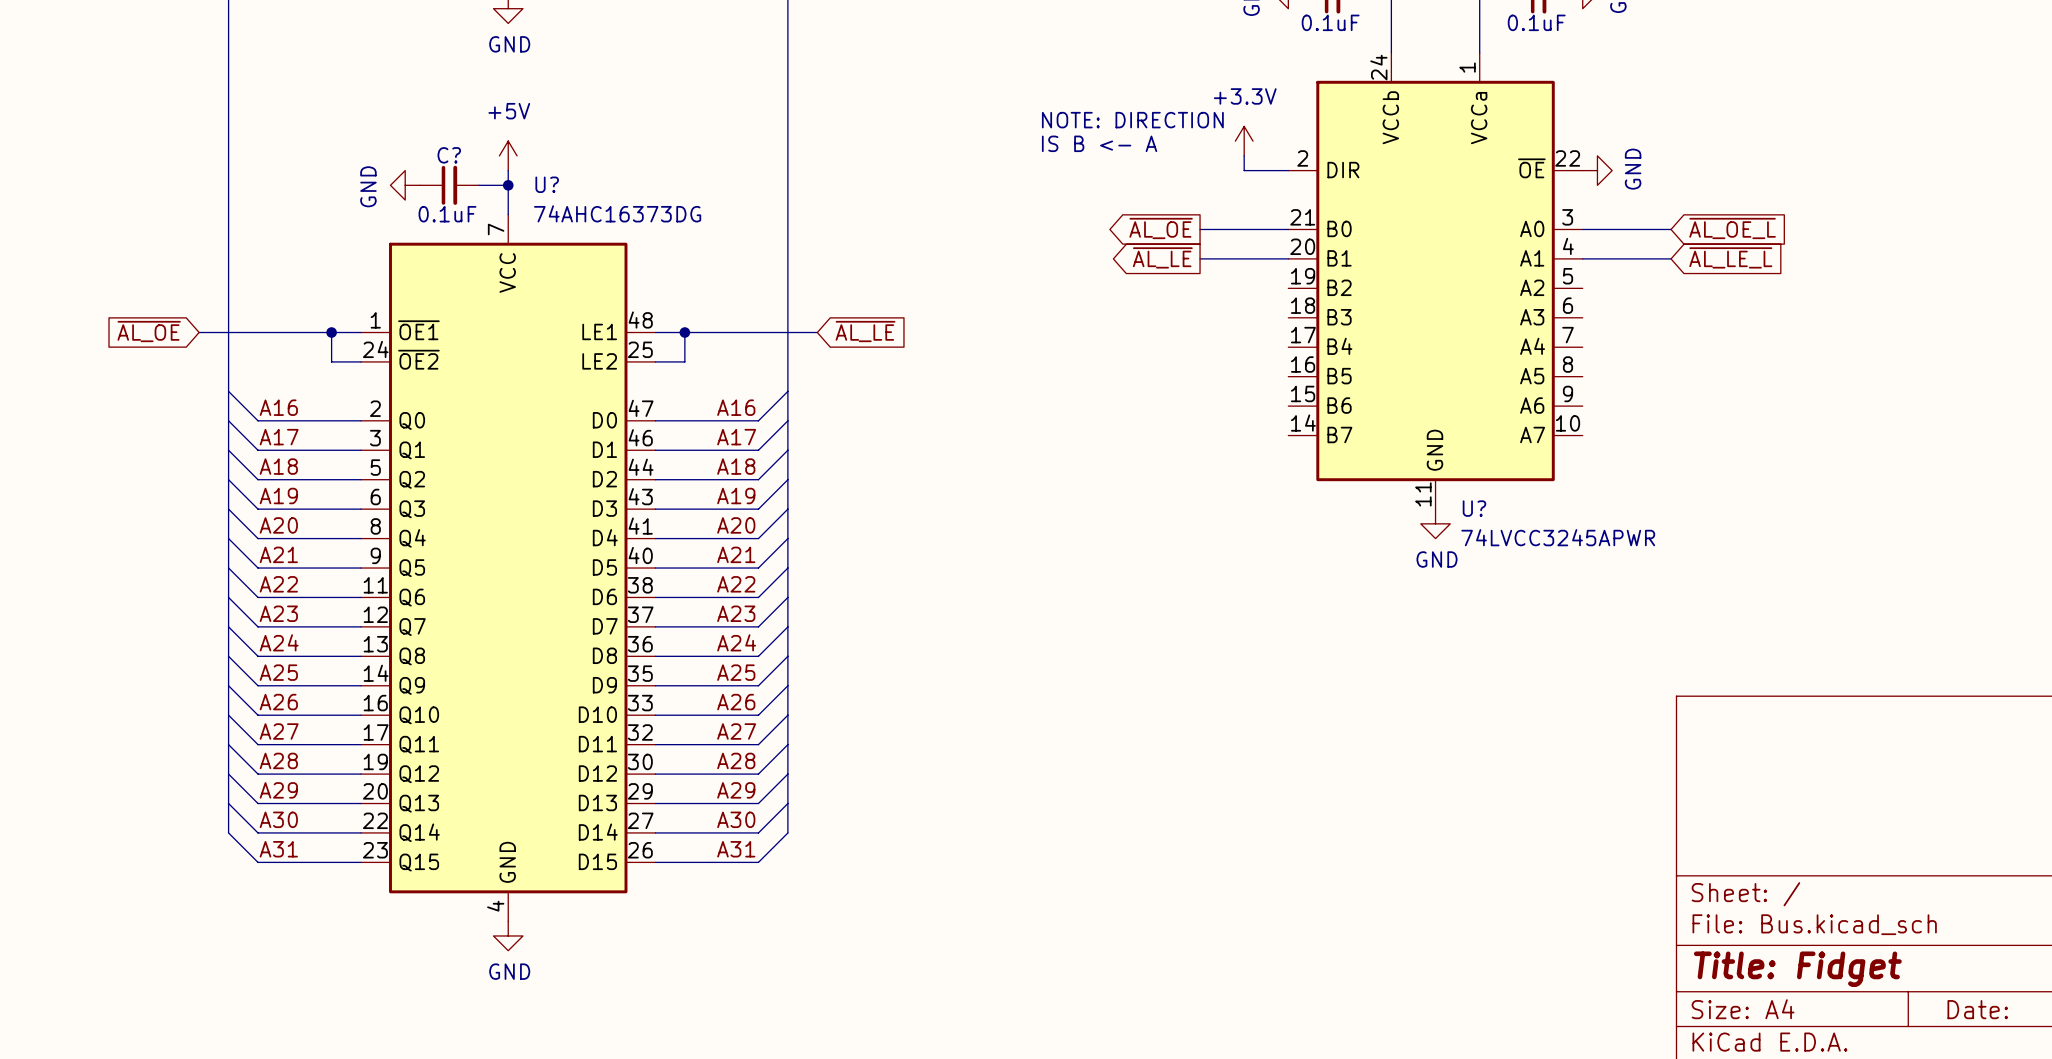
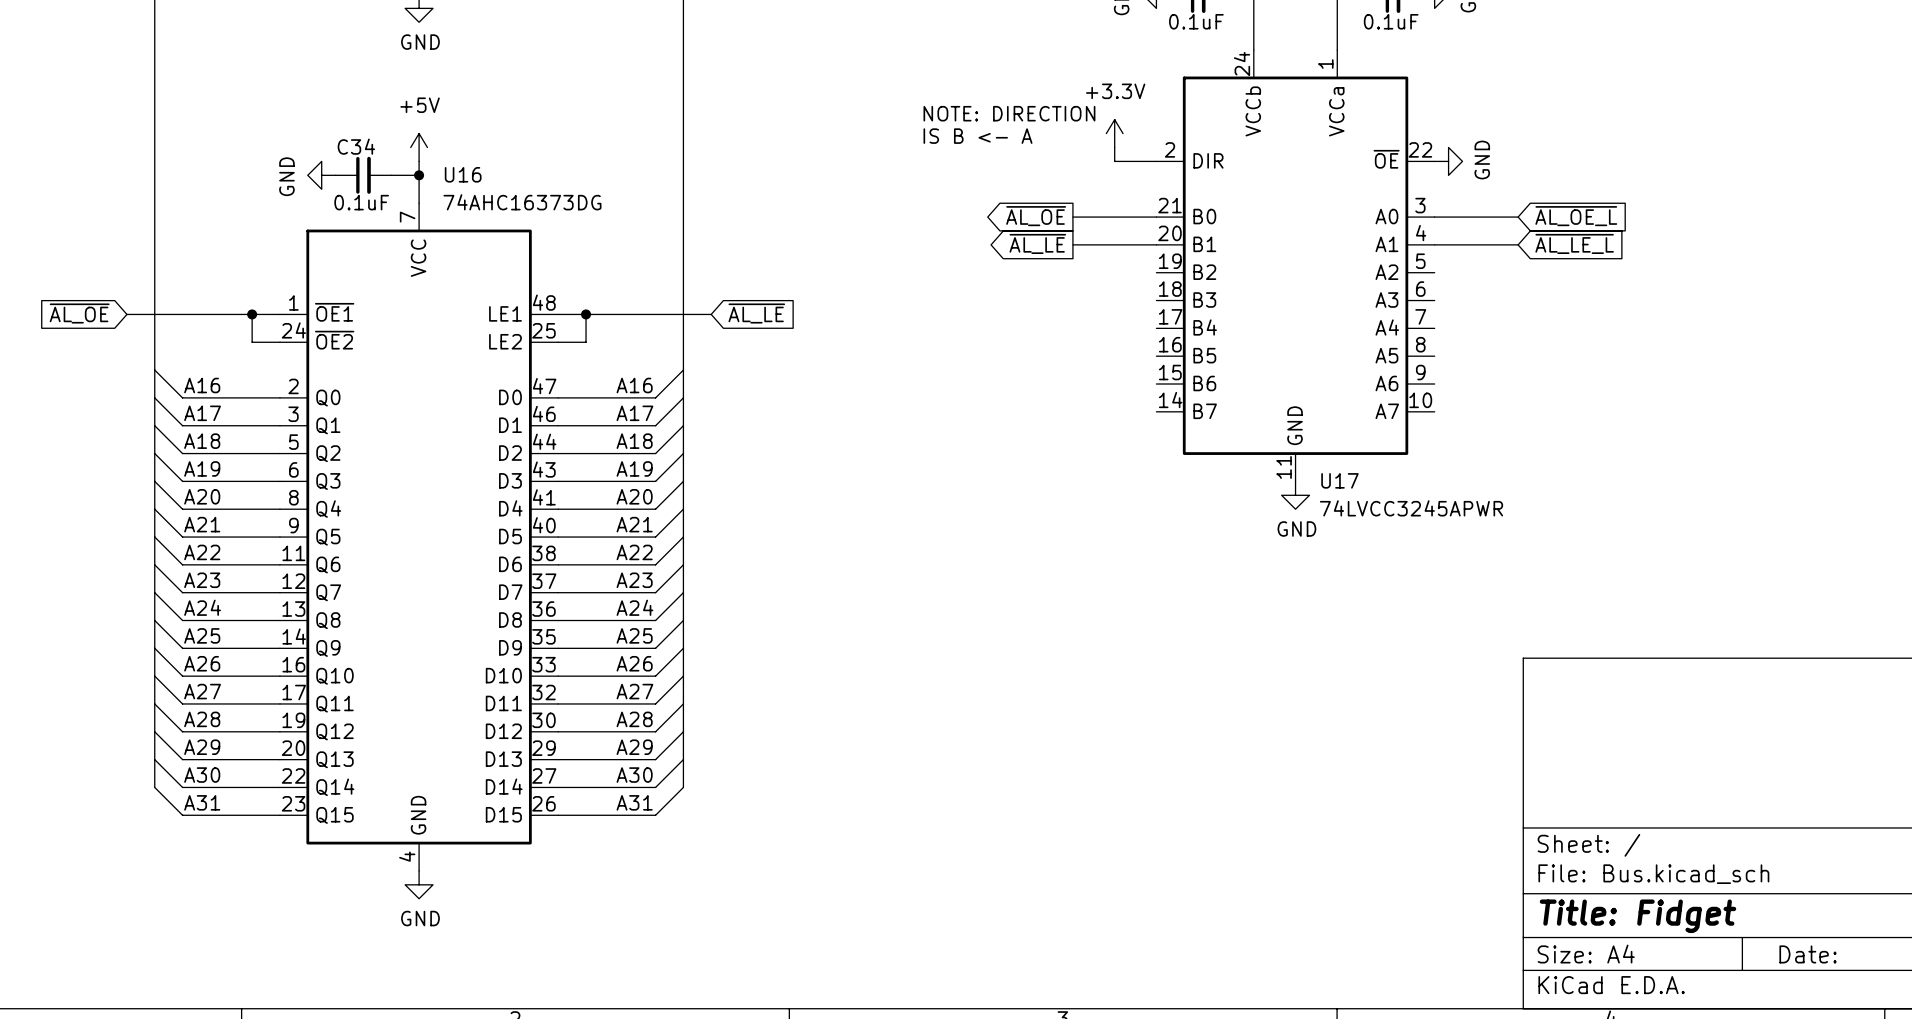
C? name: C? (449, 155) -> C34 (356, 146)
U? name: U? (547, 184) -> U16 (463, 174)
U? name: U? (1474, 508) -> U17 (1339, 480)

